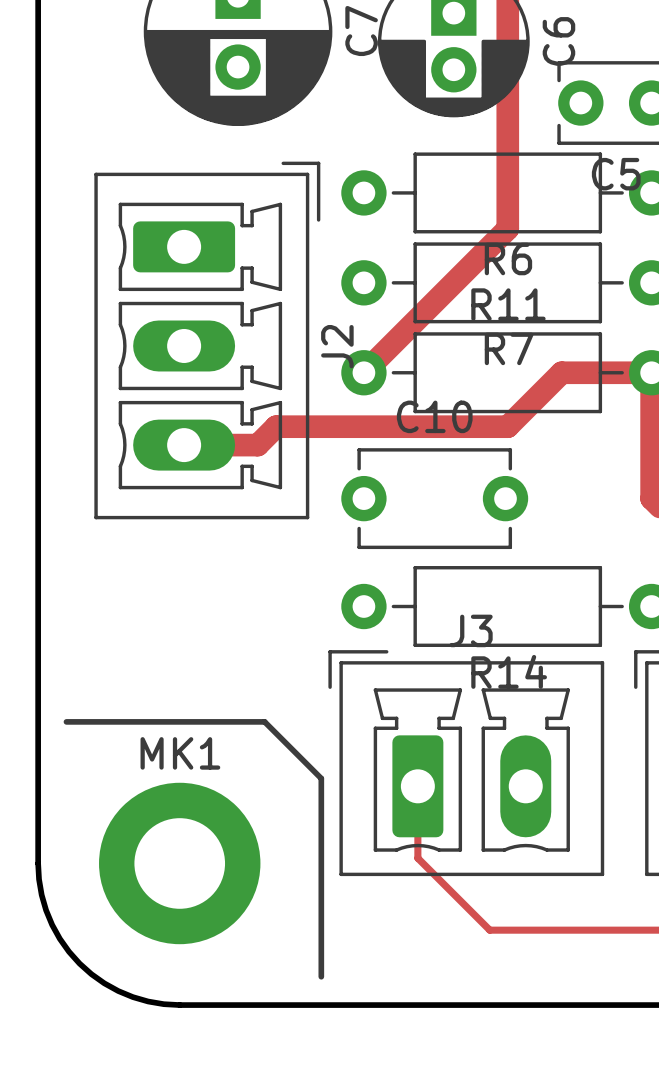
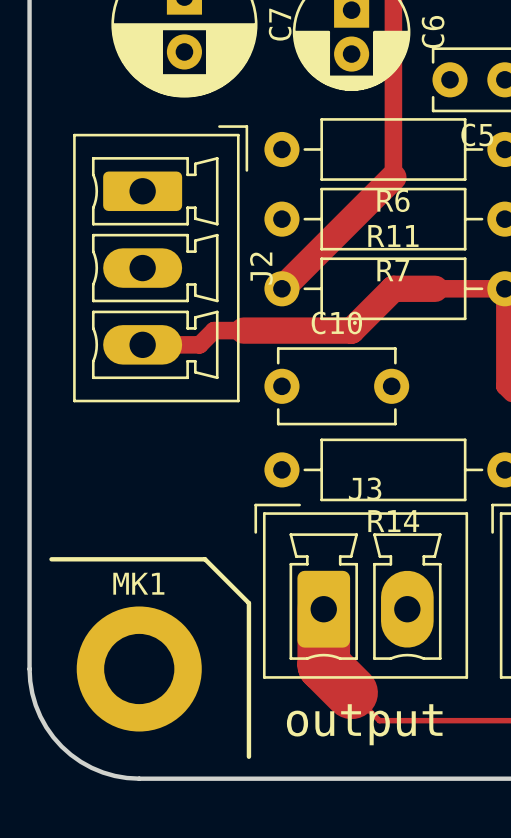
track width: thin (507, 228) (363, 372) -> thick (393, 177) (281, 288)
track: (561, 372) (507, 426) (453, 426) -> (435, 288) (393, 288) (351, 330)
track width: thin (314, 426) (453, 426) -> thick (243, 330) (351, 330)
J3 footprint: [328, 650, 605, 877] -> [254, 503, 469, 679]
track width: thin (417, 786) (417, 858) (453, 894) -> thick (323, 609) (323, 664) (351, 692)
J3 value: none -> output (364, 724)

